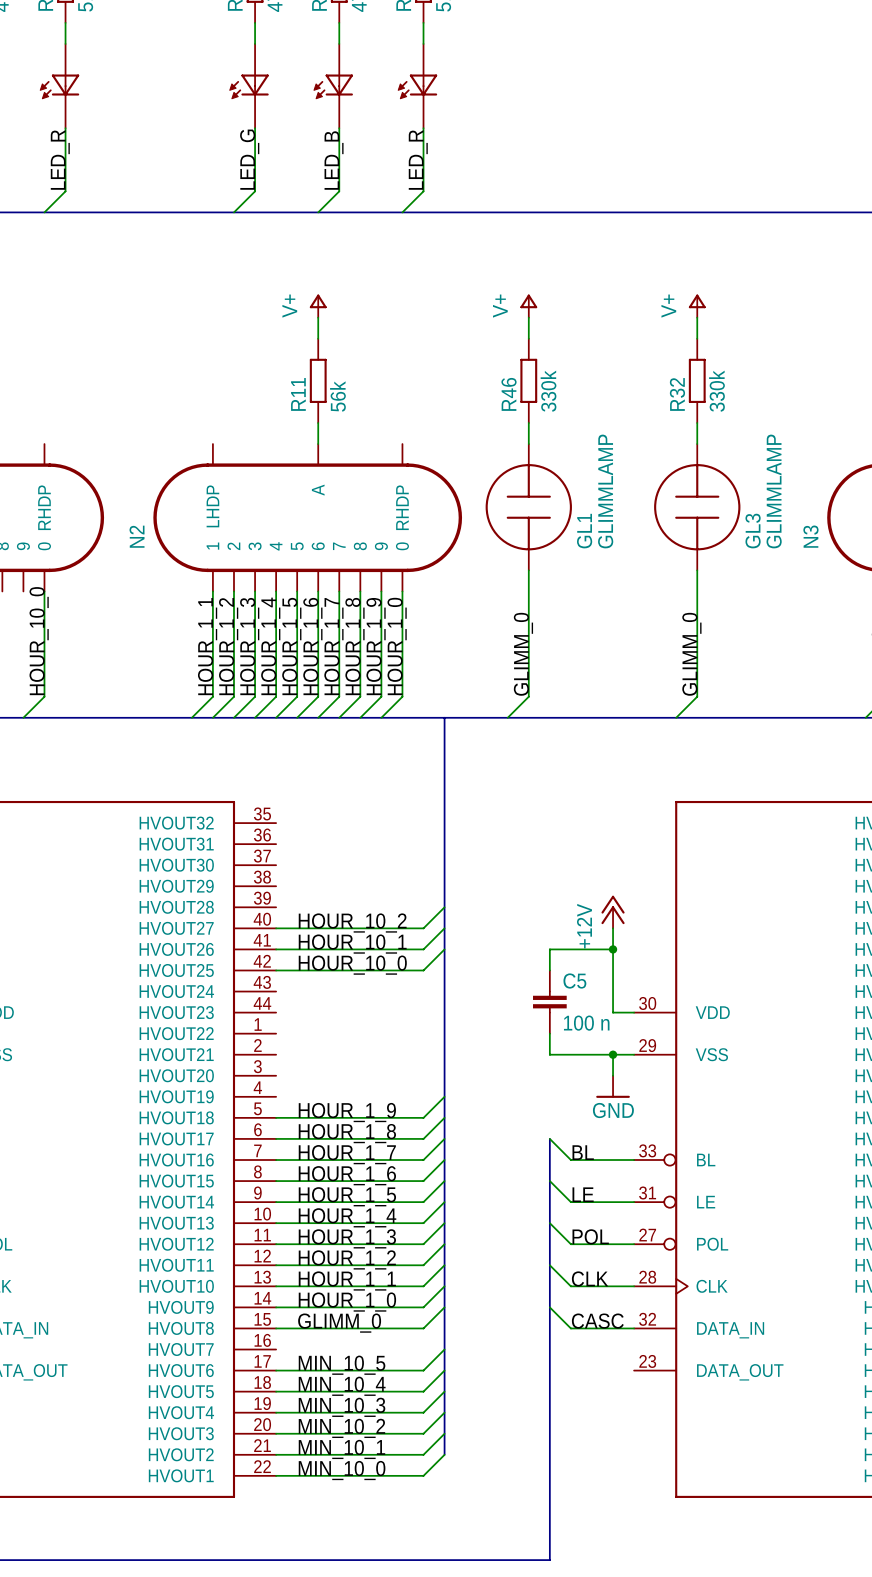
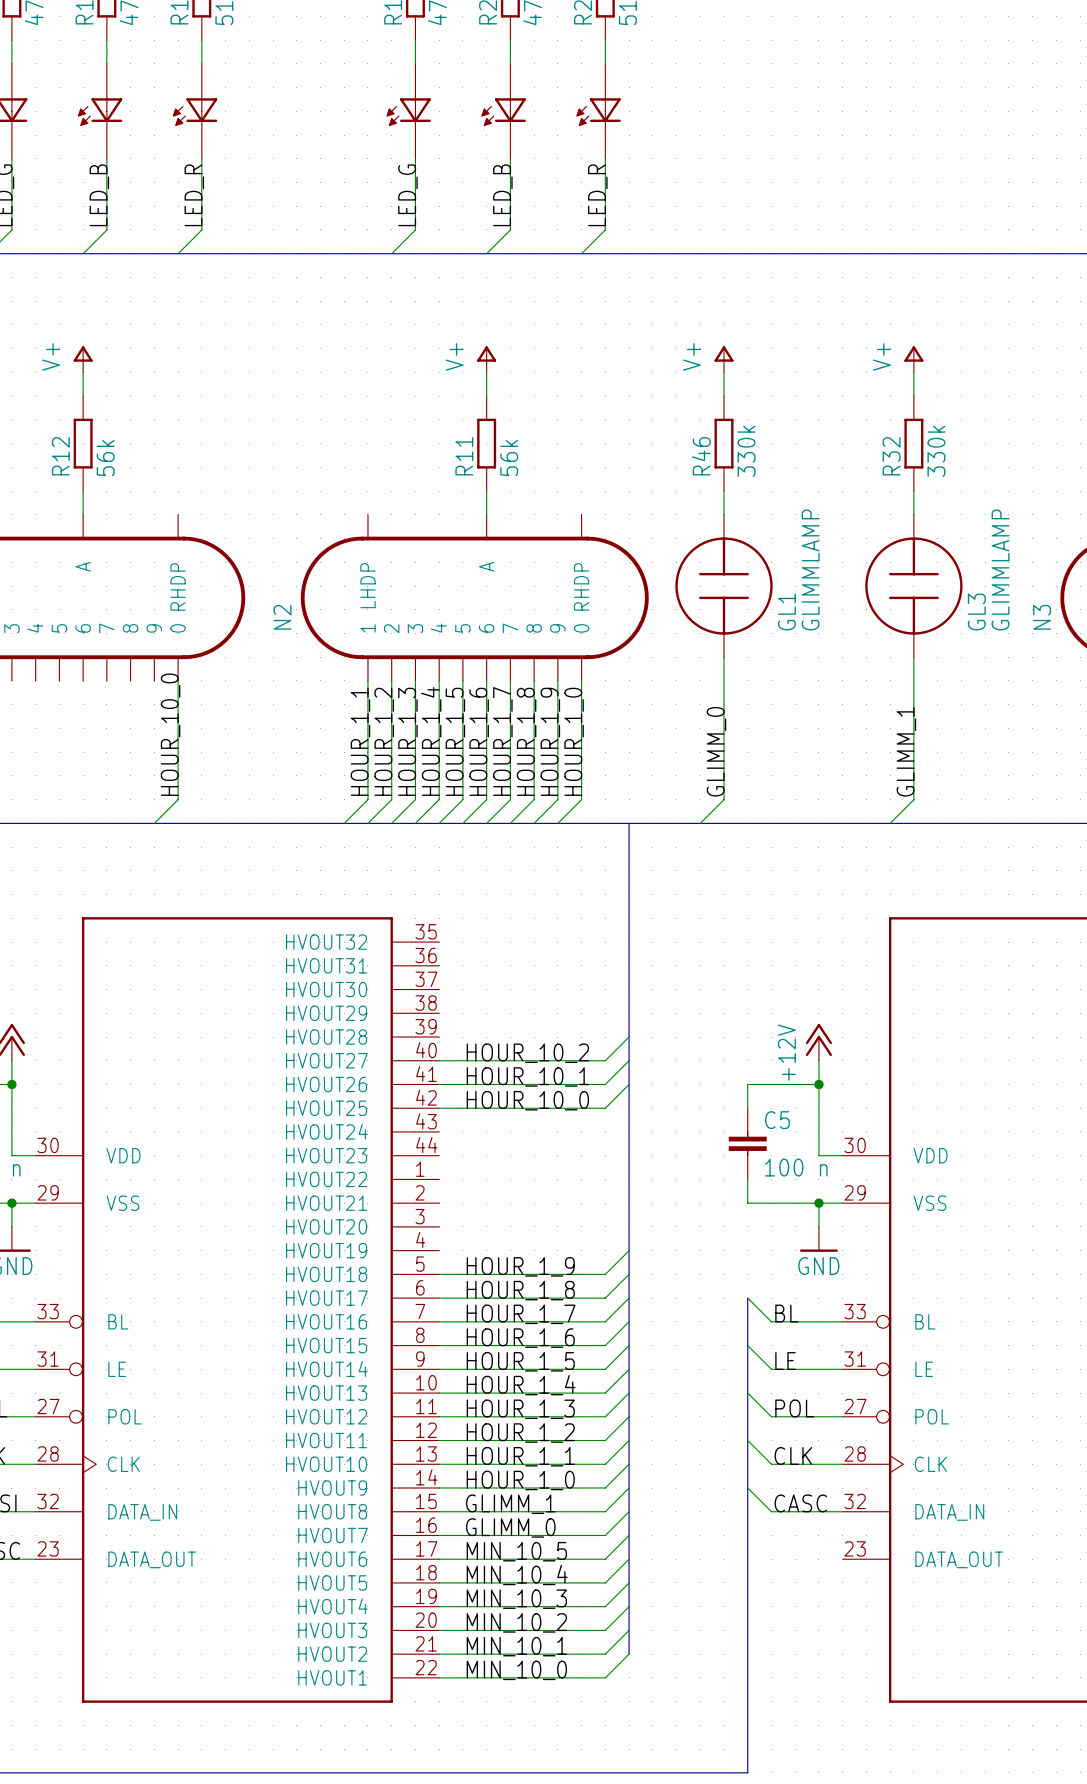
label: GLIMM_0 (691, 654) -> GLIMM_1 (906, 751)
label: GLIMM_0 (339, 1323) -> GLIMM_1 (510, 1504)
wire: none -> (629, 1511) (605, 1535) (439, 1535)
label: none -> GLIMM_0 (510, 1527)

